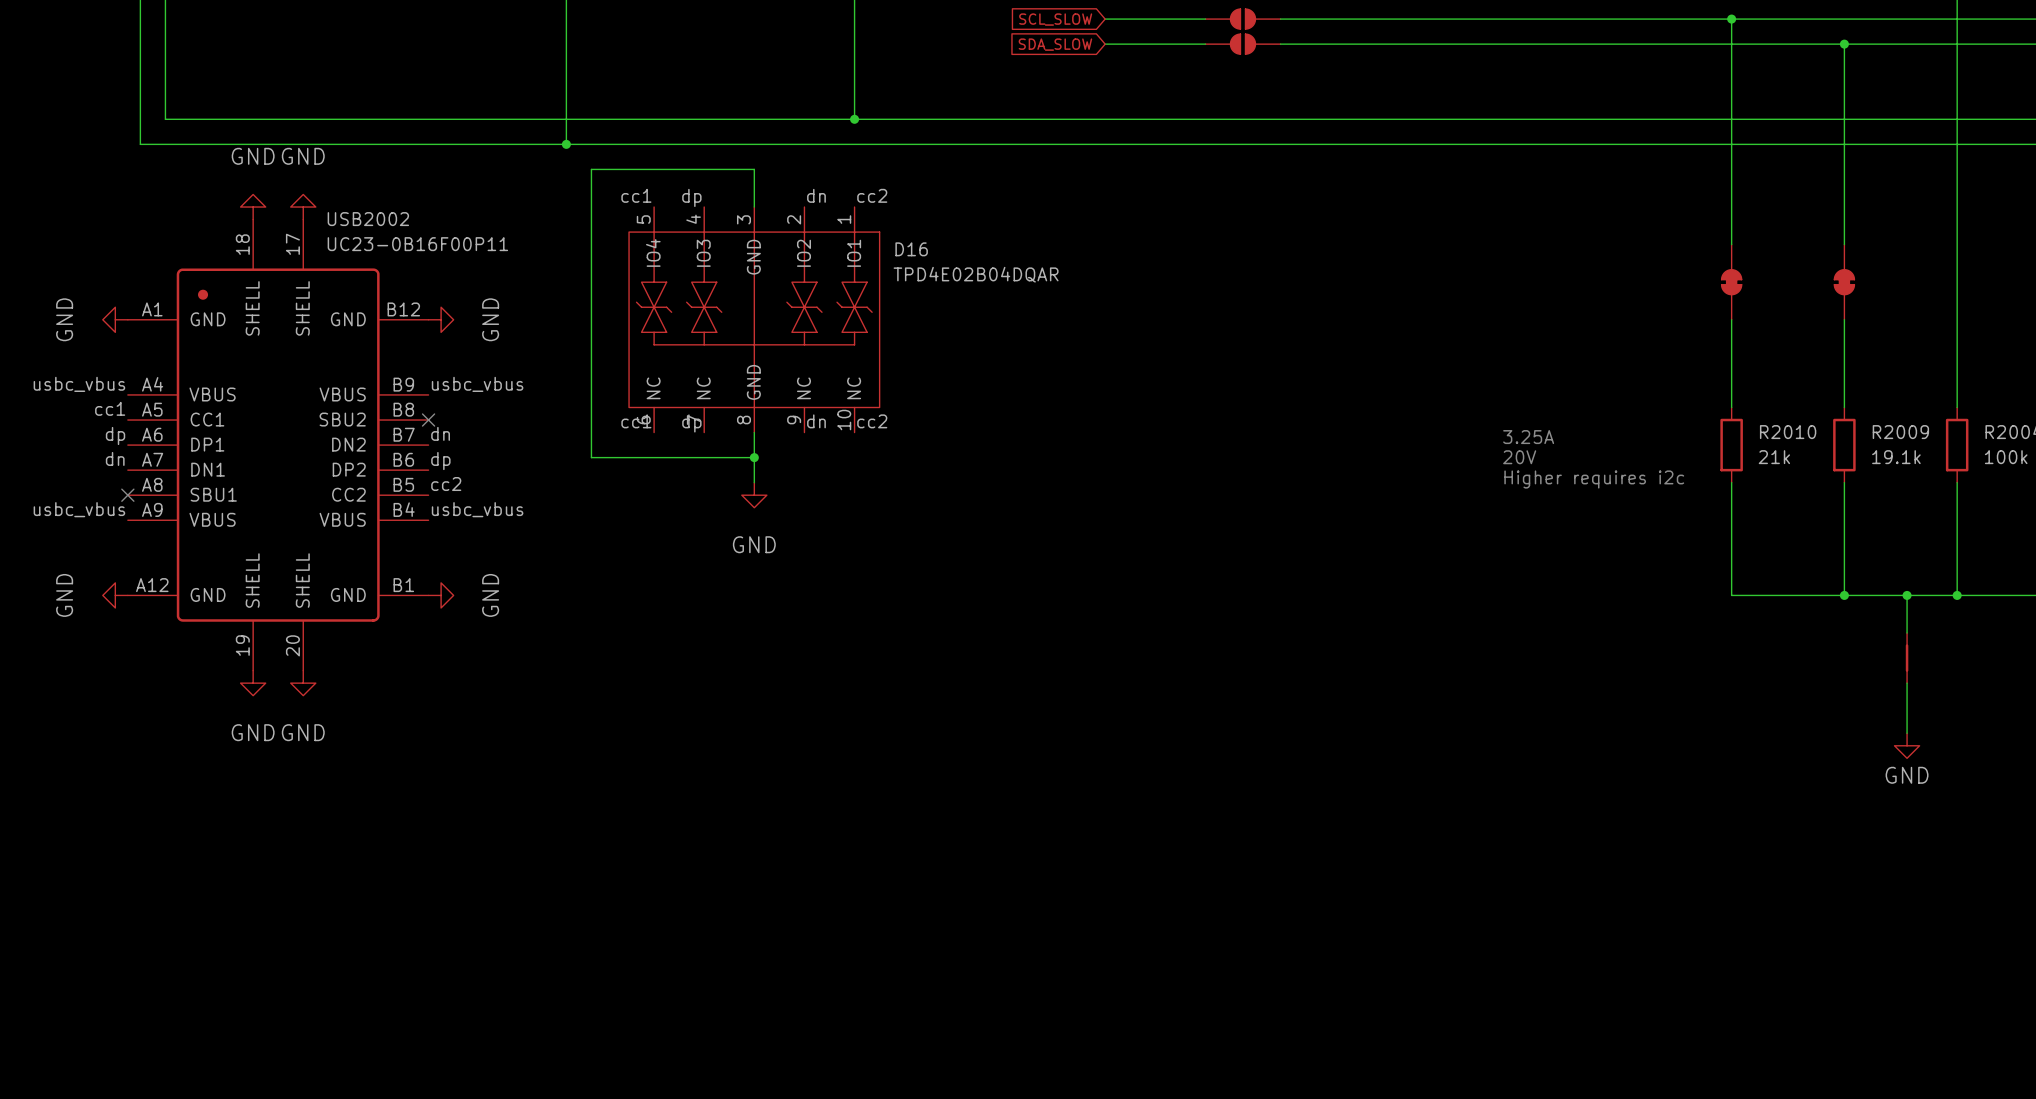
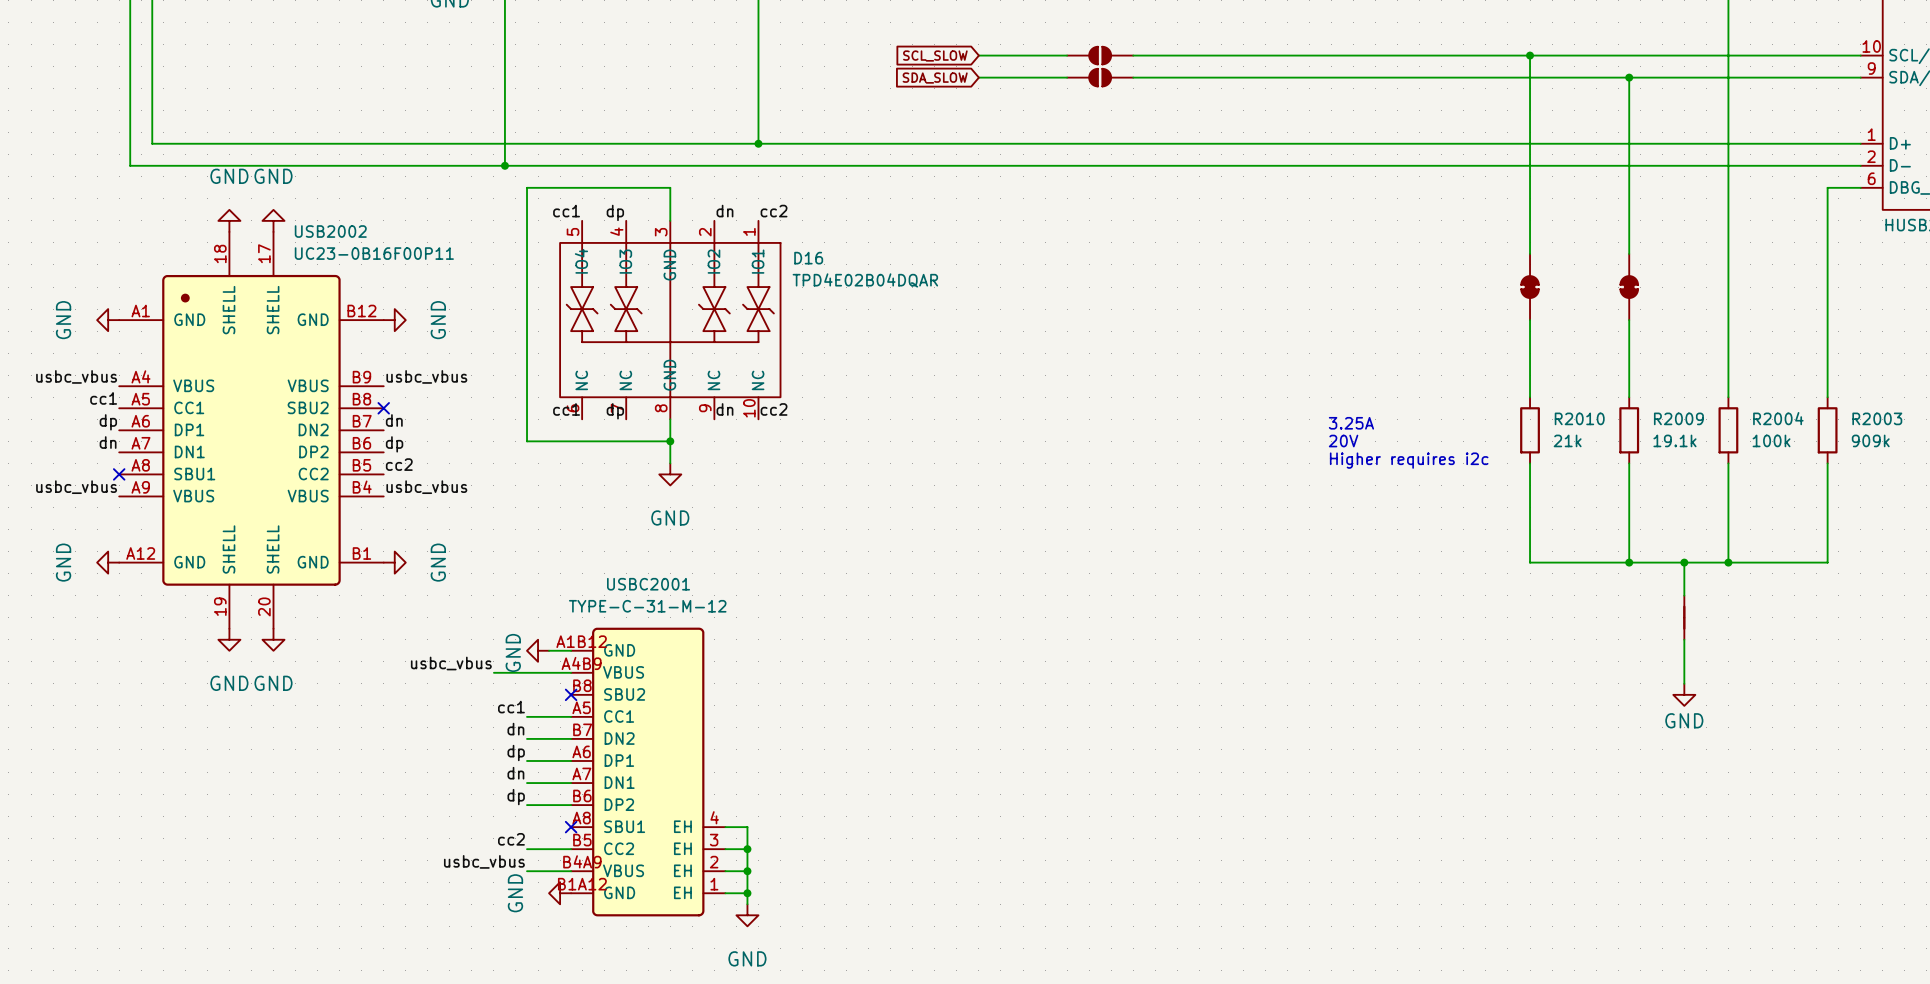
power symbol: none -> GND (538, 650)
wire: none -> (549, 650) (571, 650)
label: none -> usbc_vbus (451, 663)
wire: none -> (493, 672) (571, 672)
no-connect mark: none -> (571, 694)
label: none -> cc1 (511, 707)
wire: none -> (527, 716) (571, 716)
label: none -> dn (515, 729)
wire: none -> (527, 738) (571, 738)
label: none -> dp (516, 752)
wire: none -> (527, 760) (571, 760)
USBC2001: none -> TYPE-C-31-M-12 (648, 772)
label: none -> dn (515, 773)
wire: none -> (527, 783) (571, 783)
label: none -> dp (516, 797)
wire: none -> (527, 805) (571, 805)
no-connect mark: none -> (571, 827)
wire: none -> (725, 827) (747, 827) (747, 904)
label: none -> cc2 (511, 839)
wire: none -> (527, 849) (571, 849)
wire: none -> (725, 849) (747, 849)
junction: none -> (747, 849)
label: none -> usbc_vbus (484, 861)
wire: none -> (527, 871) (571, 871)
wire: none -> (725, 871) (747, 871)
junction: none -> (747, 871)
power symbol: none -> GND (560, 893)
wire: none -> (725, 893) (747, 893)
junction: none -> (747, 893)
power symbol: none -> GND (747, 915)

